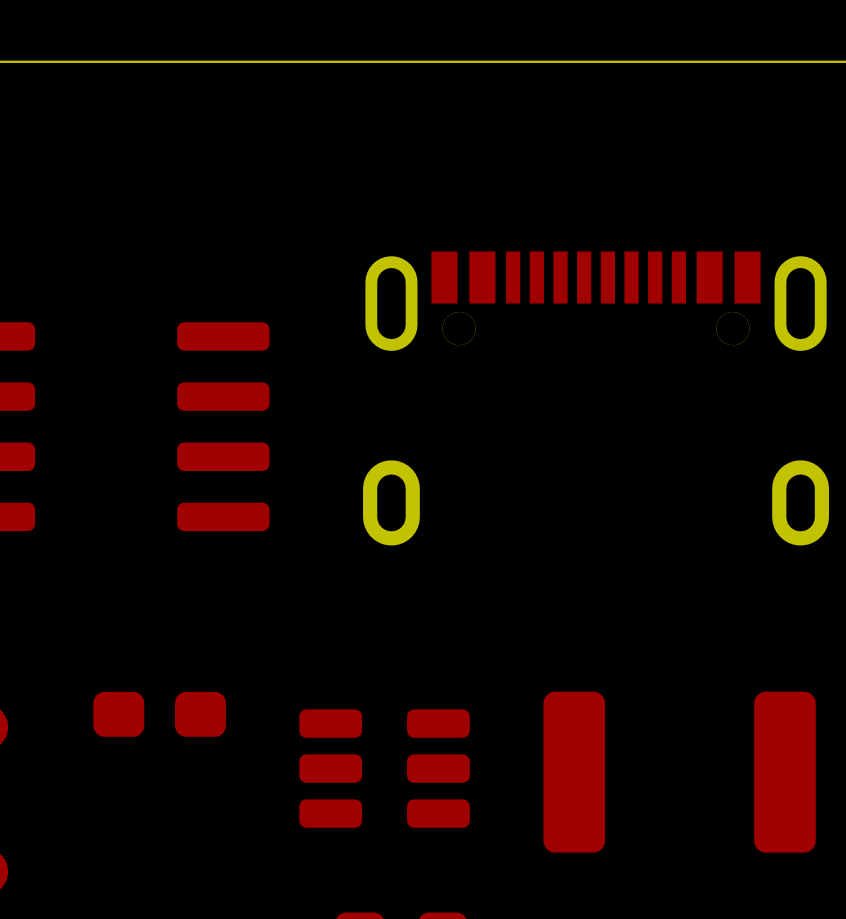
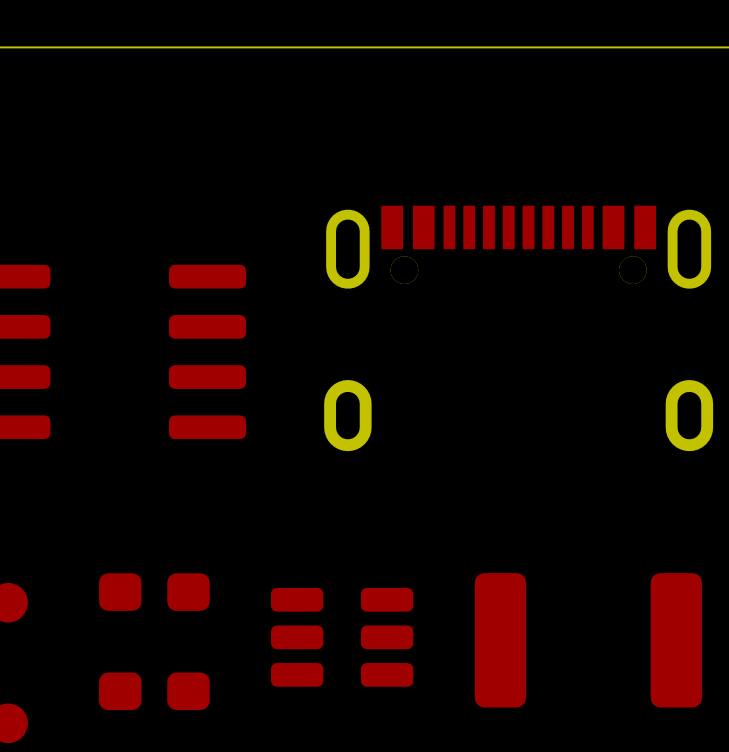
part: none -> (154, 691)

